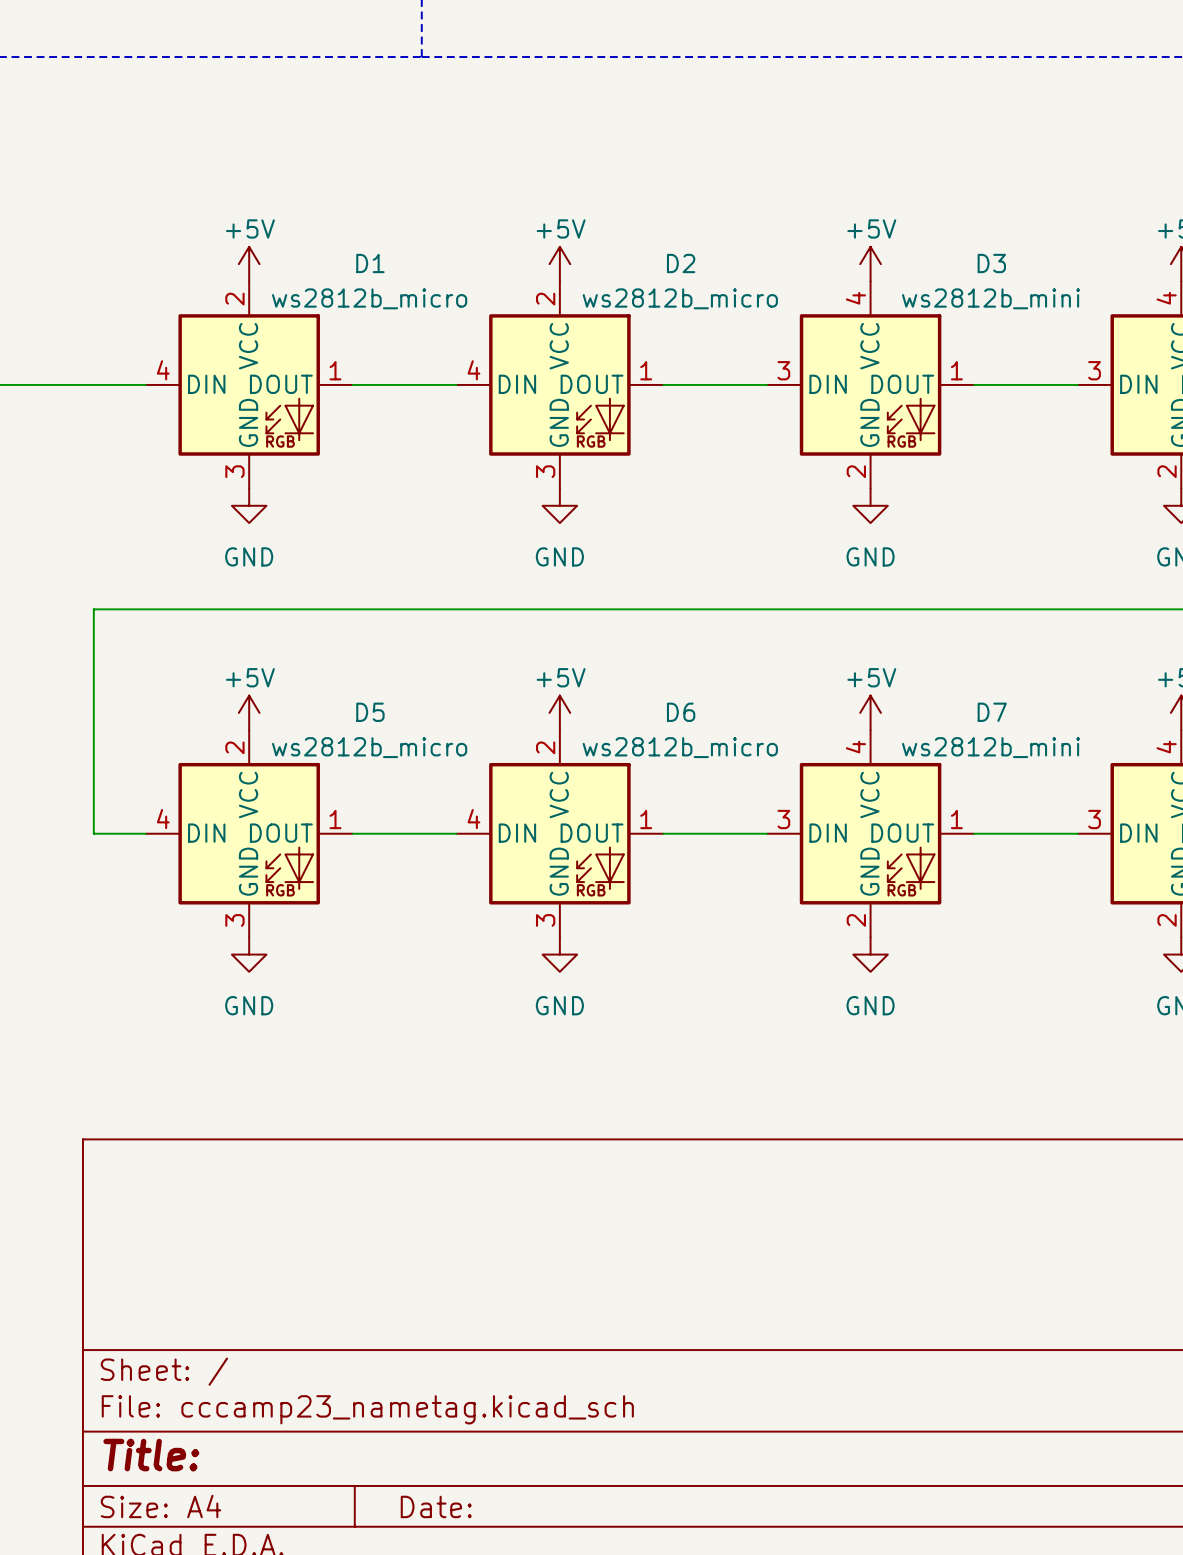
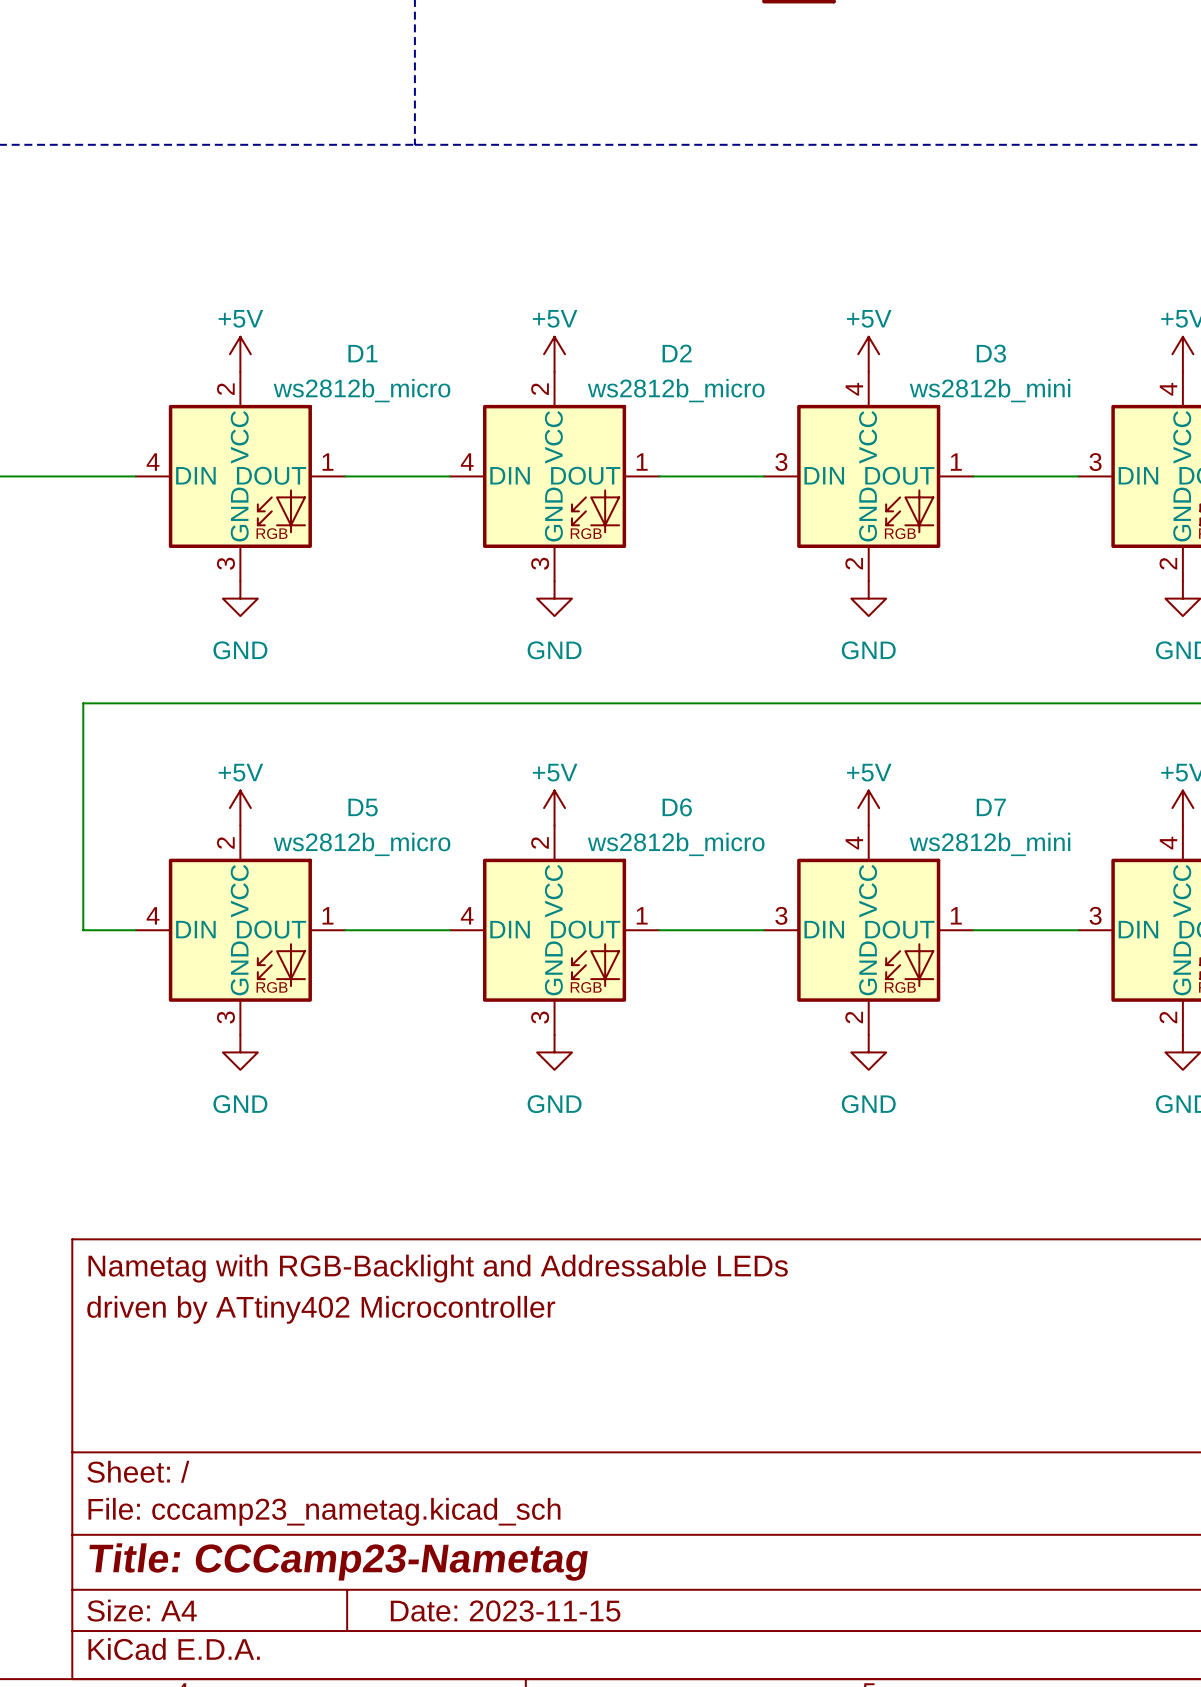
title block: none -> Nametag with RGB-Backlight and Addressable LEDs (438, 1268)
title block: none -> driven by ATtiny402 Microcontroller (321, 1309)
title block: Title: (151, 1455) -> Title: CCCamp23-Nametag (338, 1562)
title block: Date: (436, 1506) -> Date: 2023-11-15 (505, 1611)

